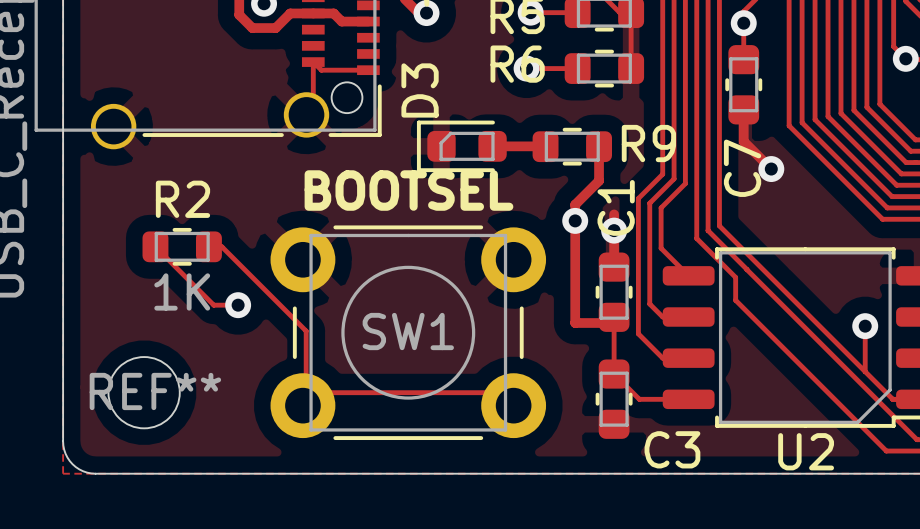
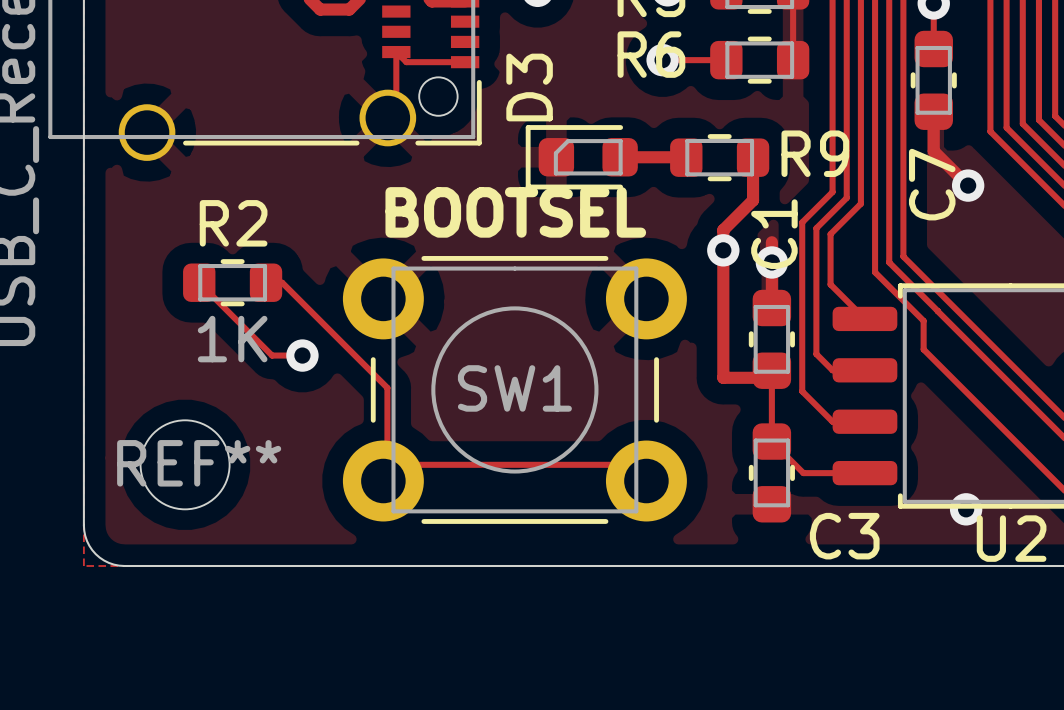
via: none -> (966, 509)

